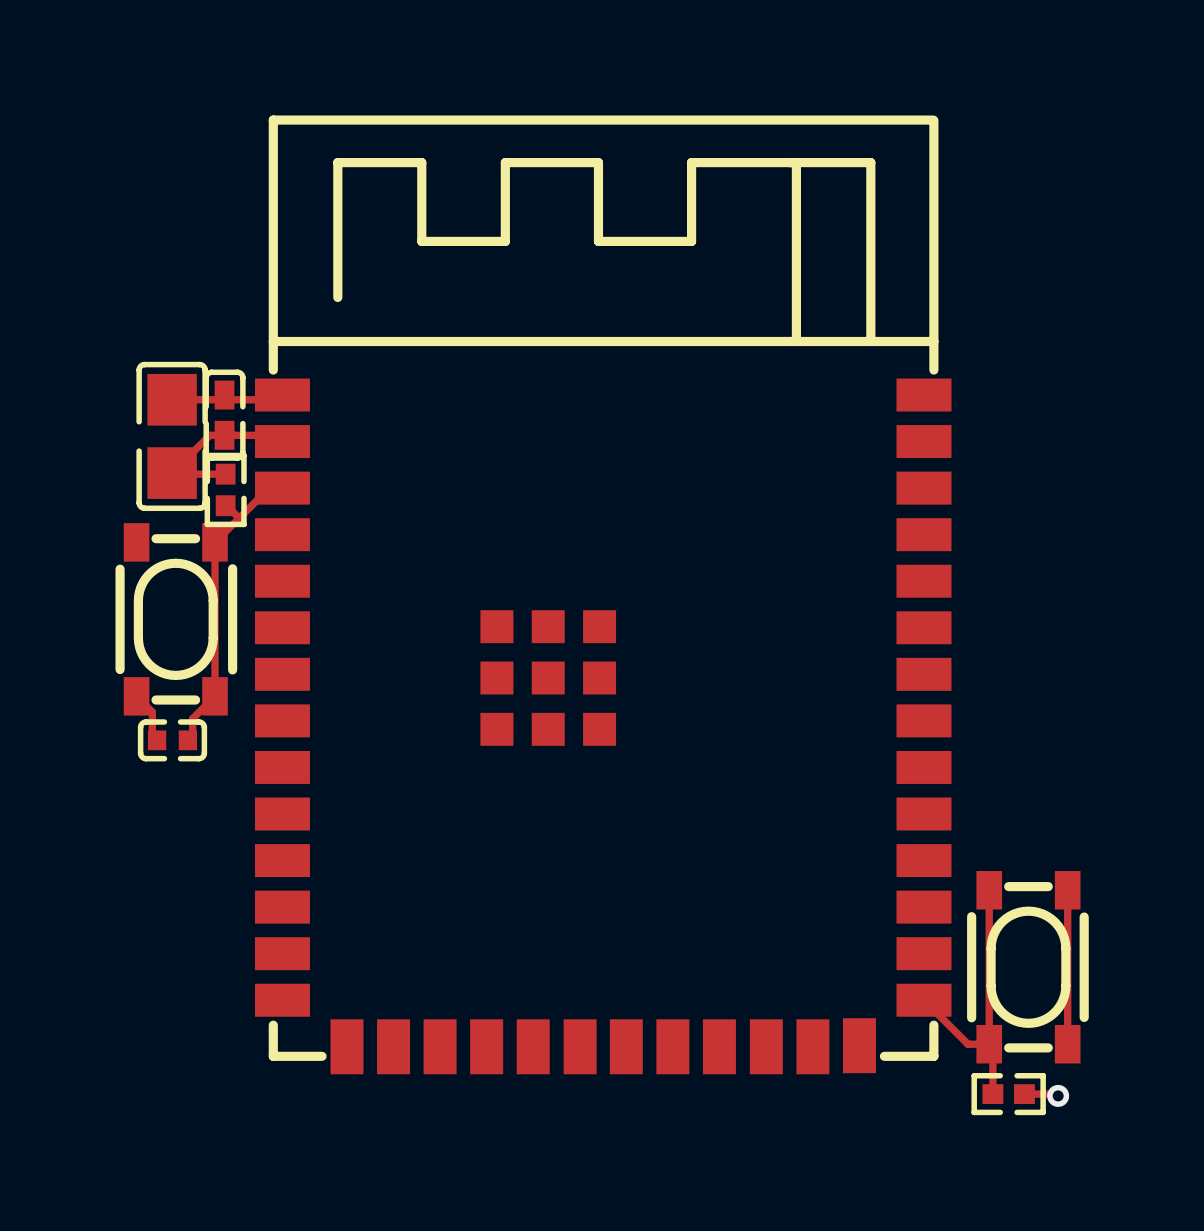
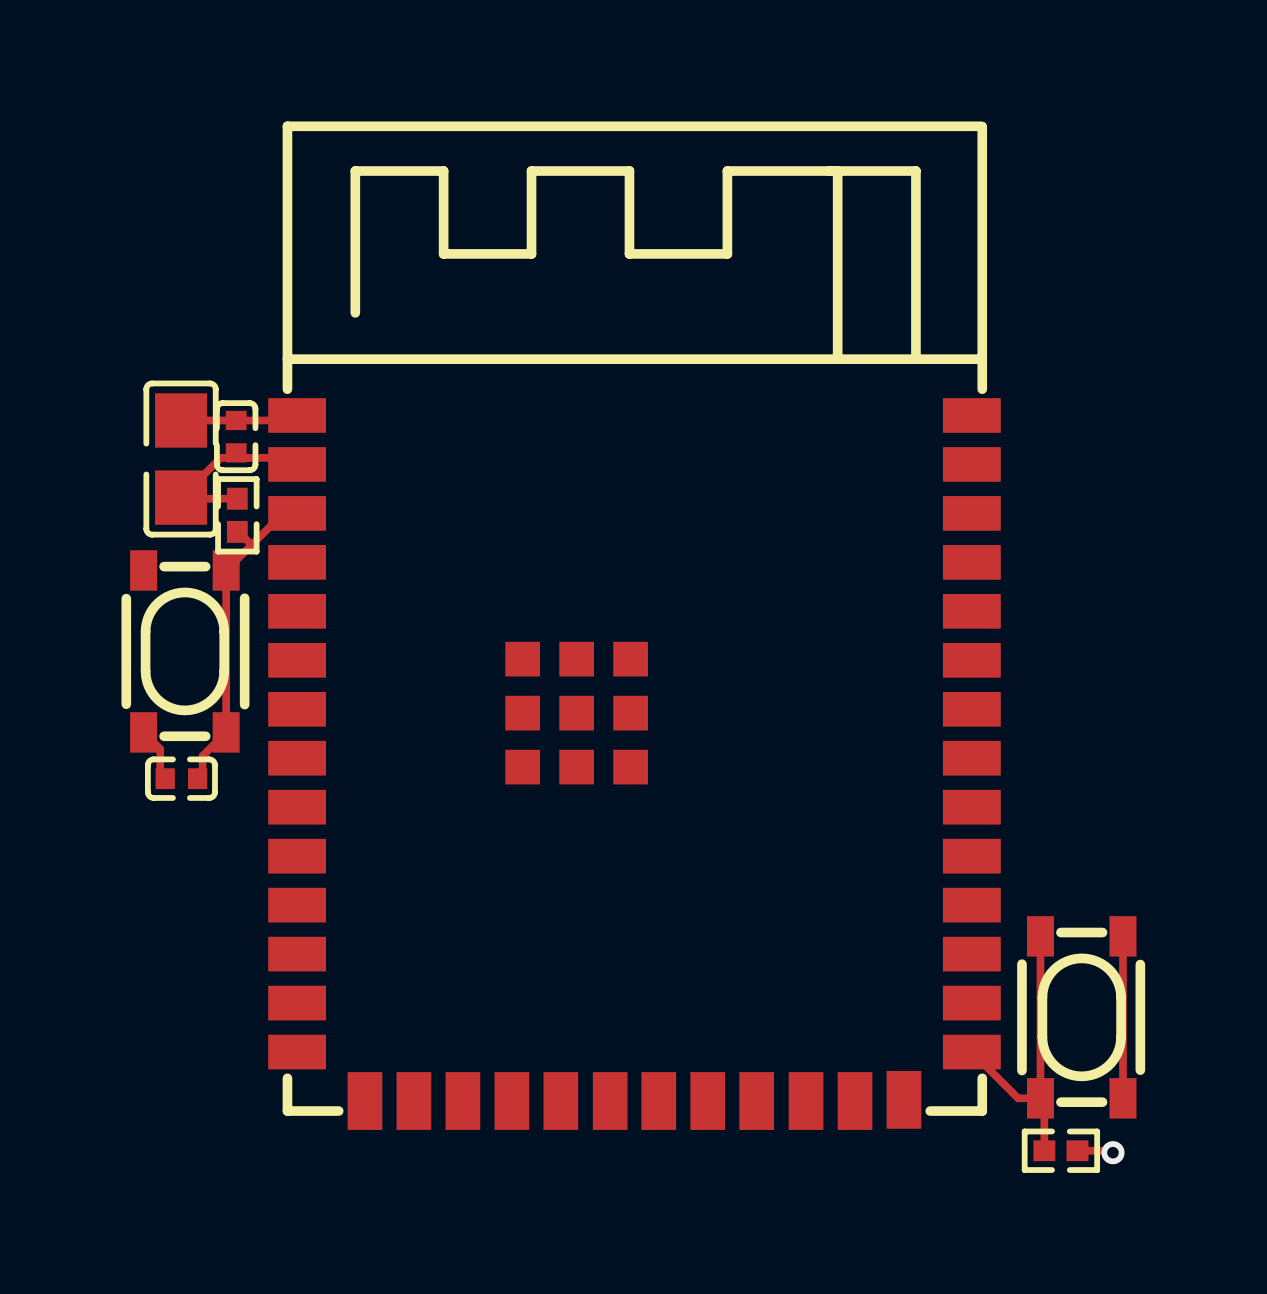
part footprint: [203, 369, 246, 461] -> [214, 400, 259, 474]

